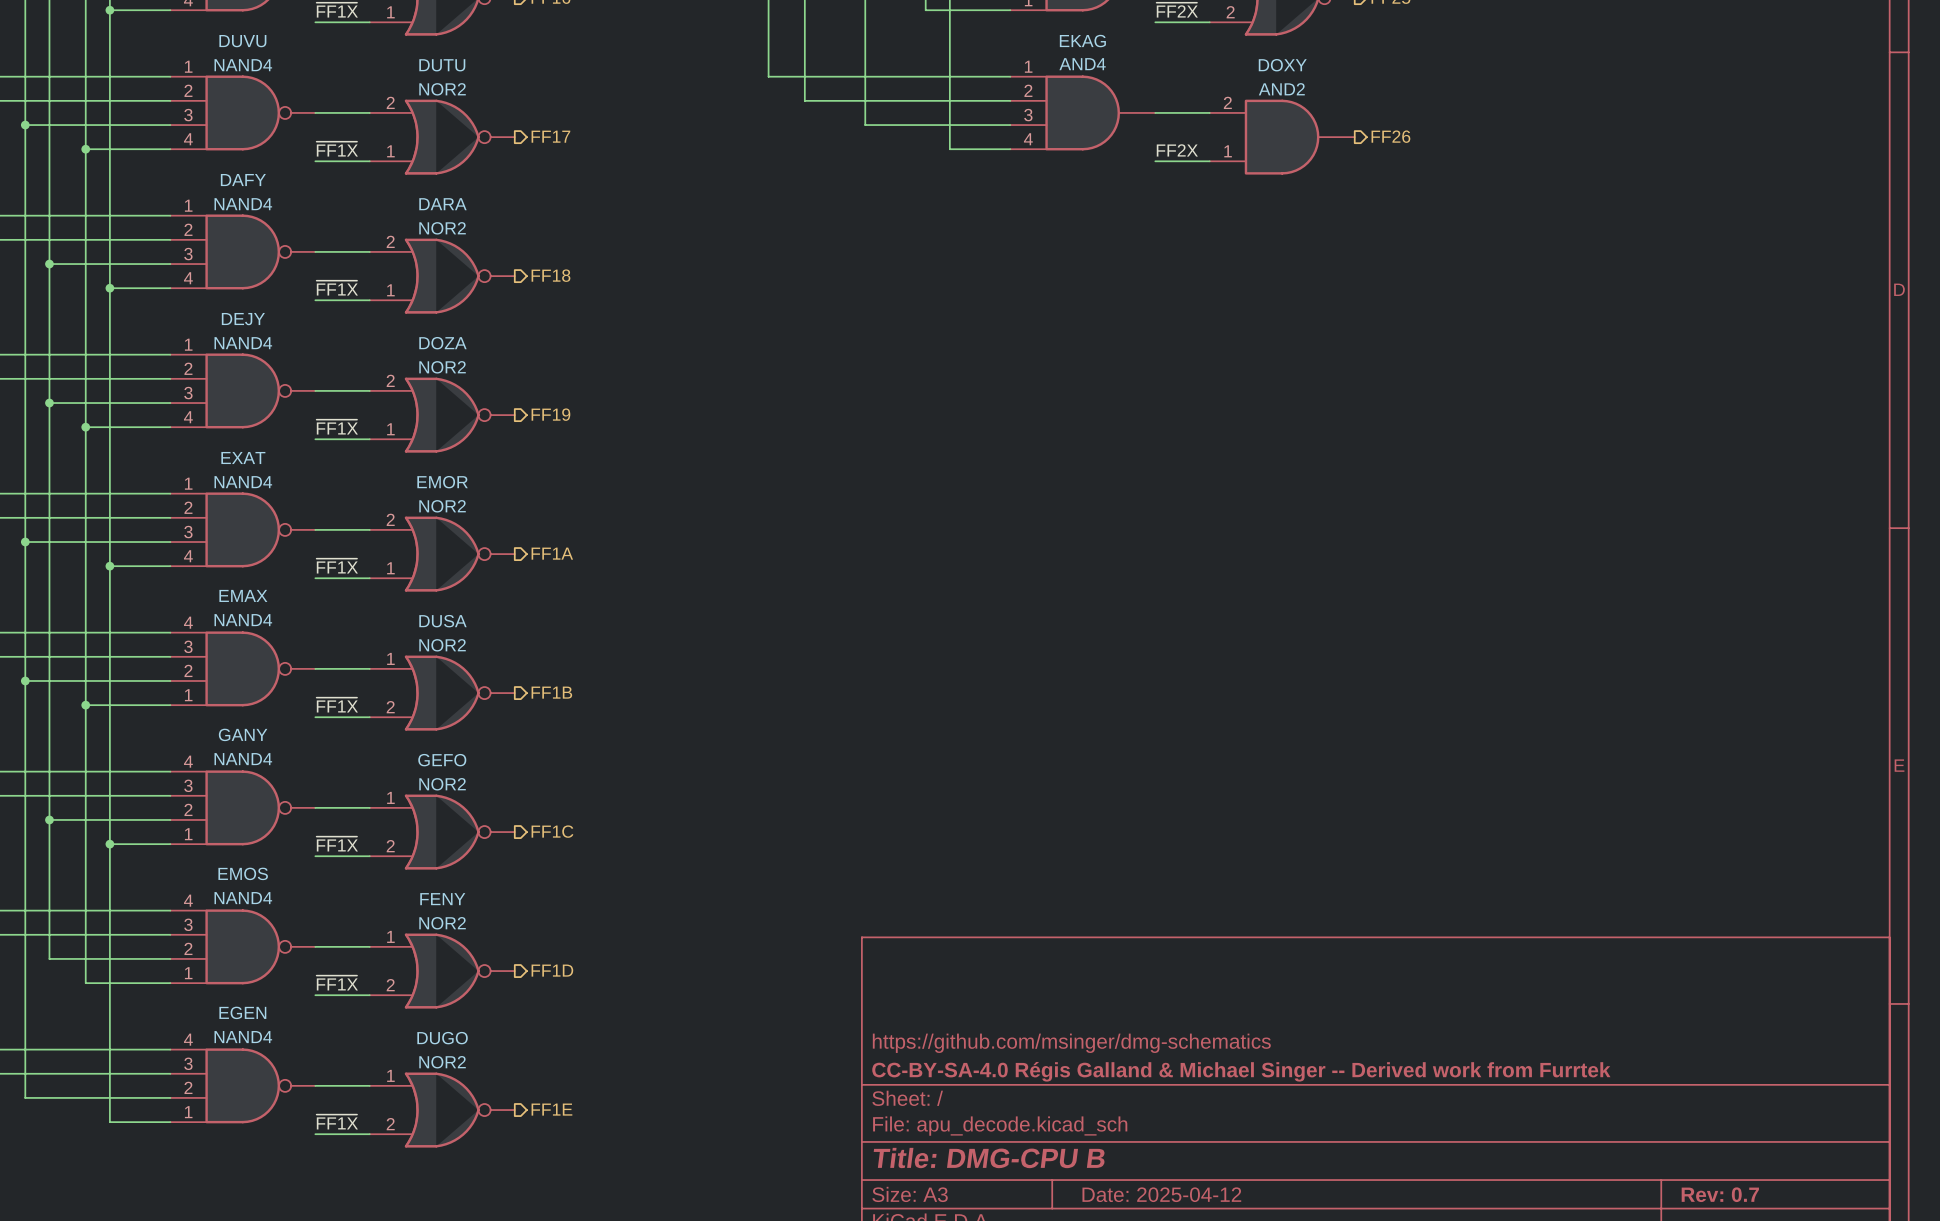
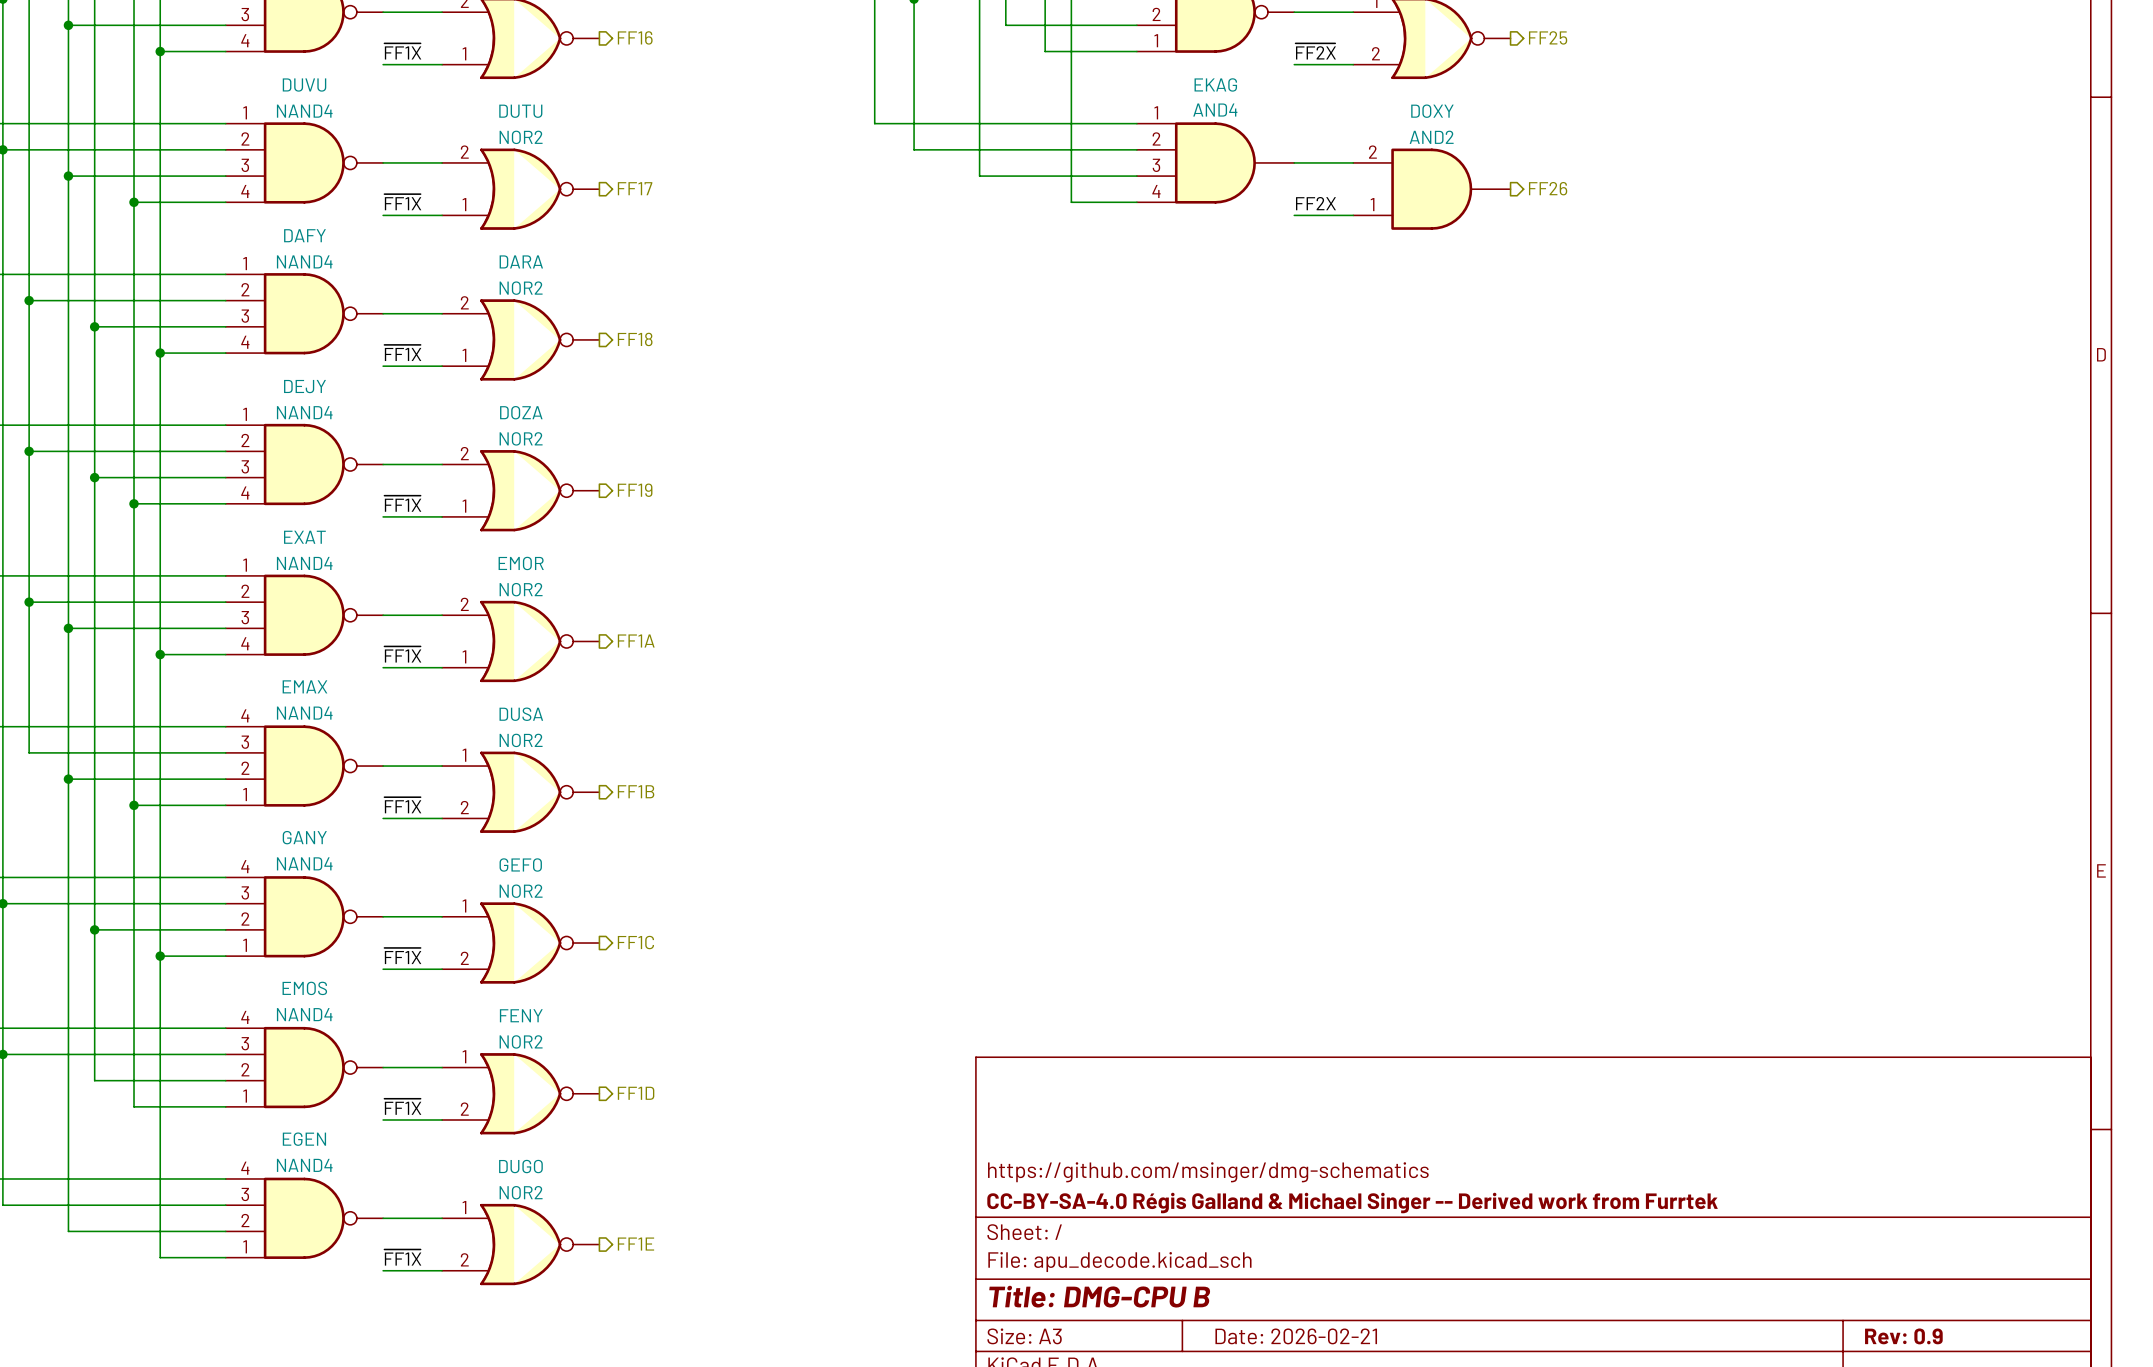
title block: Date: 2025-04-12 (1161, 1194) -> Date: 2026-02-21 (1296, 1336)
title block: Rev: 0.7 (1720, 1194) -> Rev: 0.9 (1903, 1336)

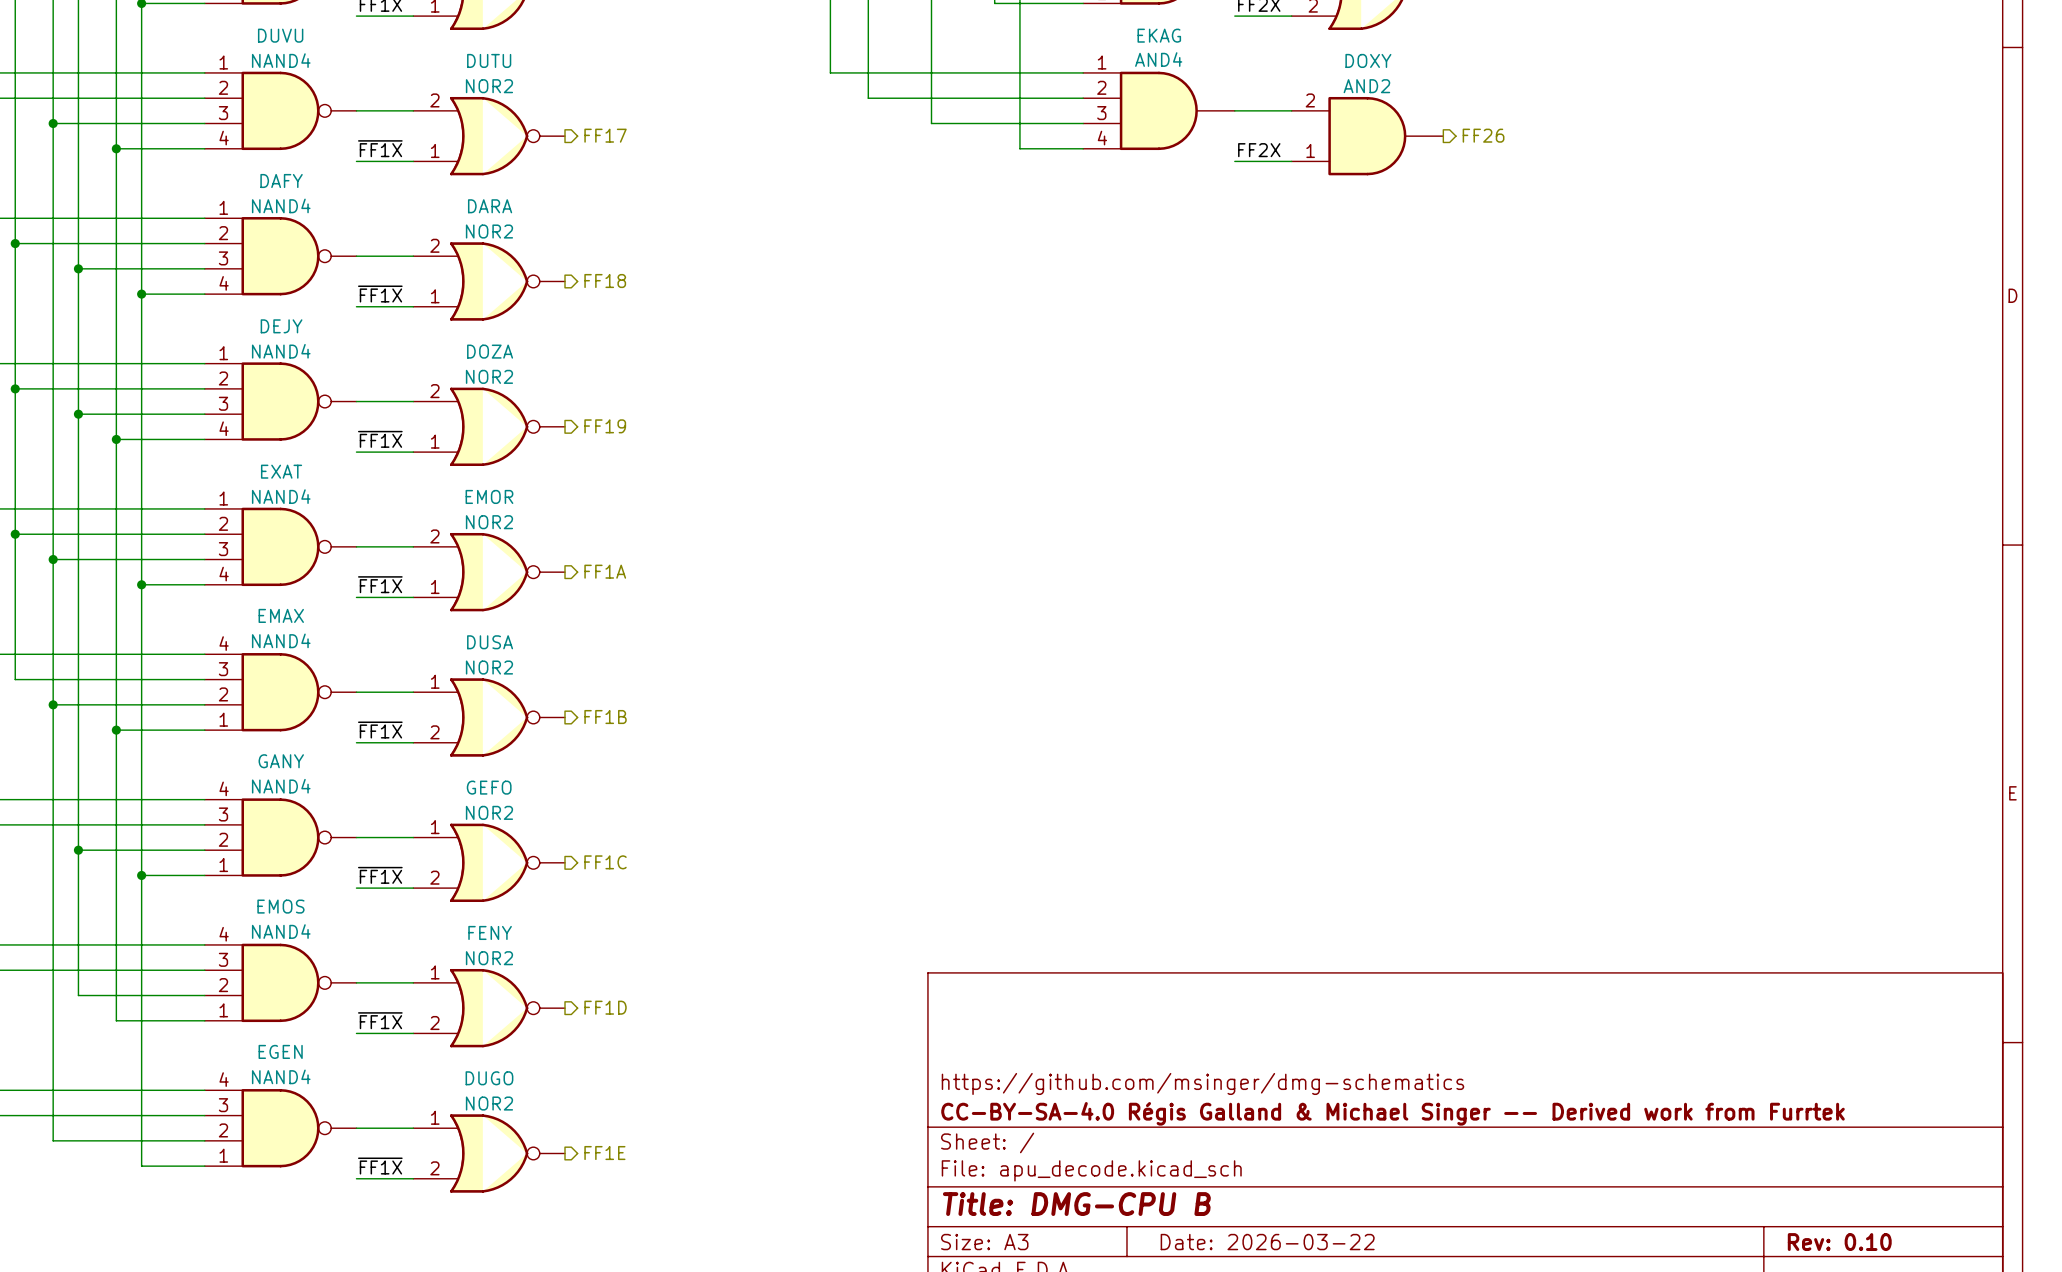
title block: Date: 2026-02-21 (1296, 1336) -> Date: 2026-03-22 (1267, 1242)
title block: Rev: 0.9 (1903, 1336) -> Rev: 0.10 (1839, 1242)

